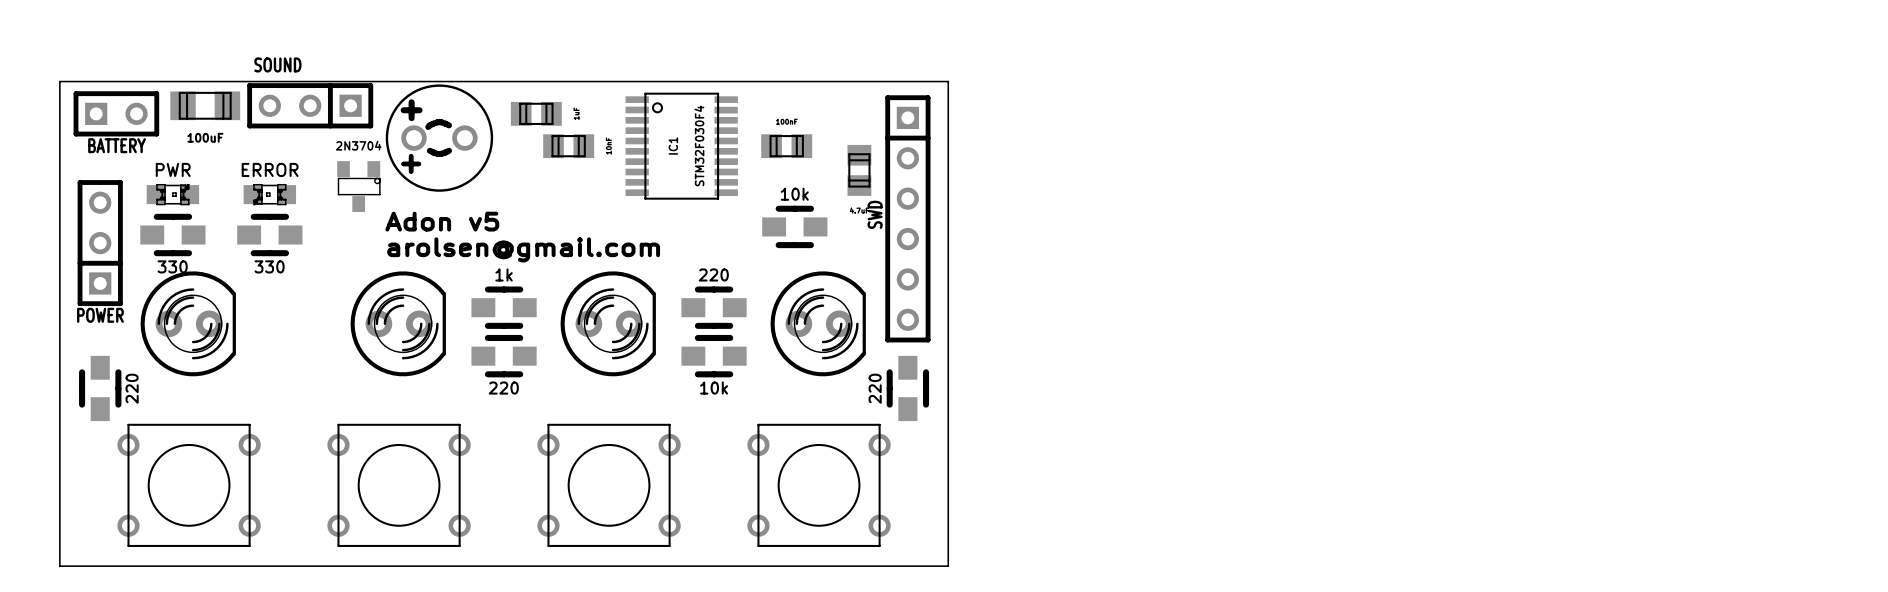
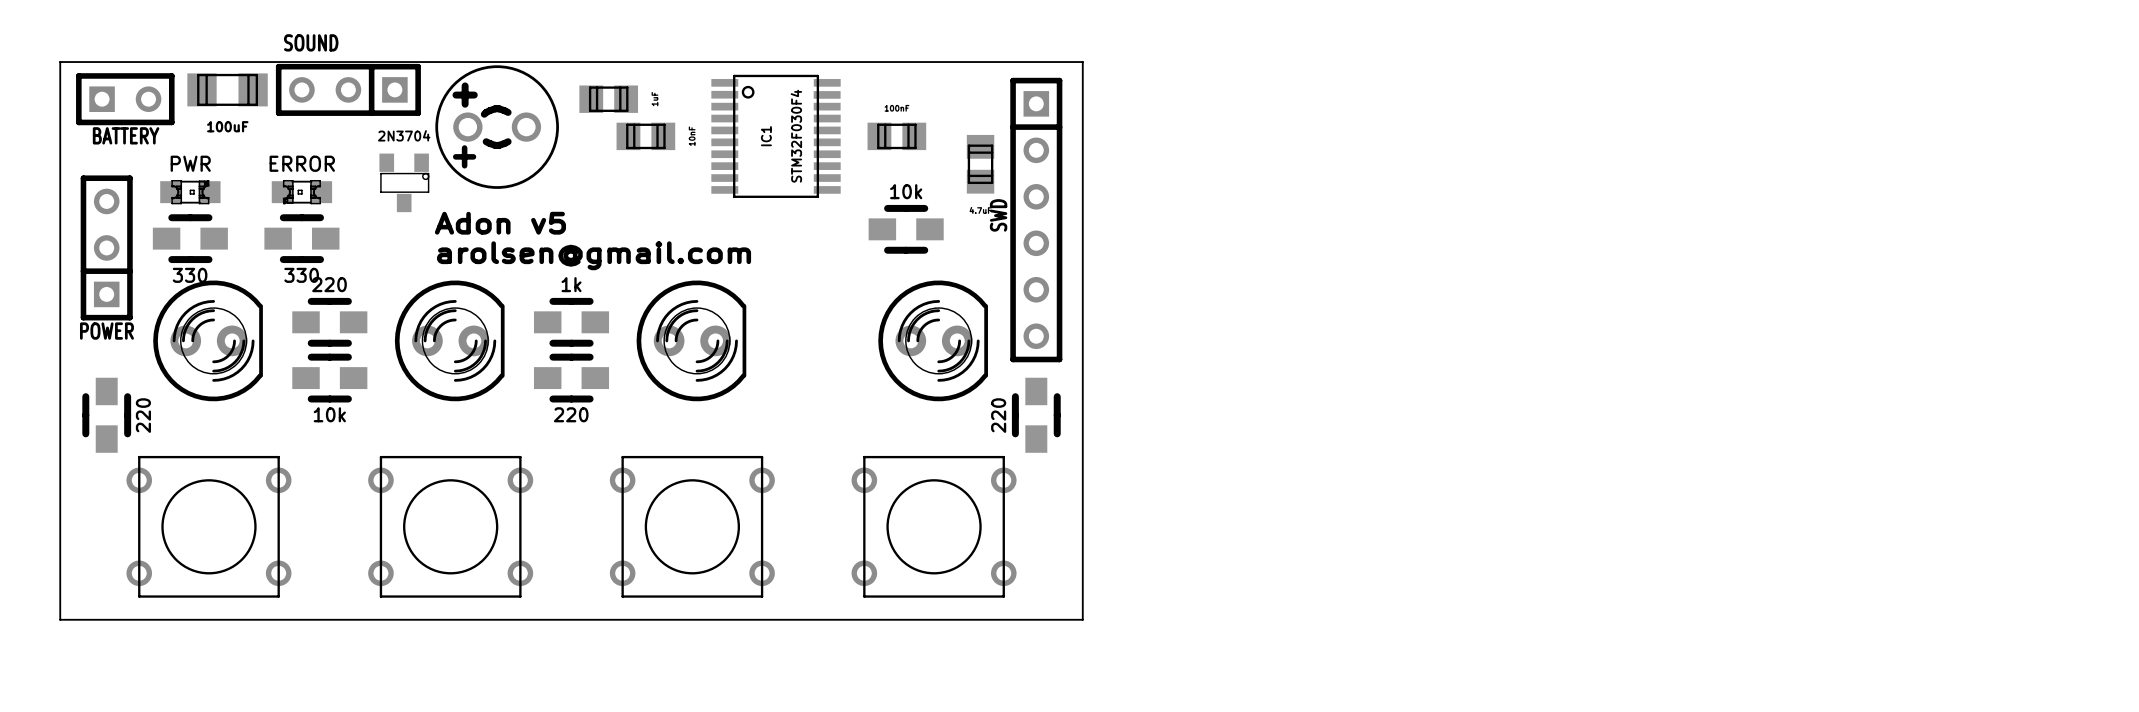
part: none -> 220 (329, 322)
part: 220 (714, 307) -> none
part: none -> 10k (329, 378)
part: 10k (714, 356) -> none

